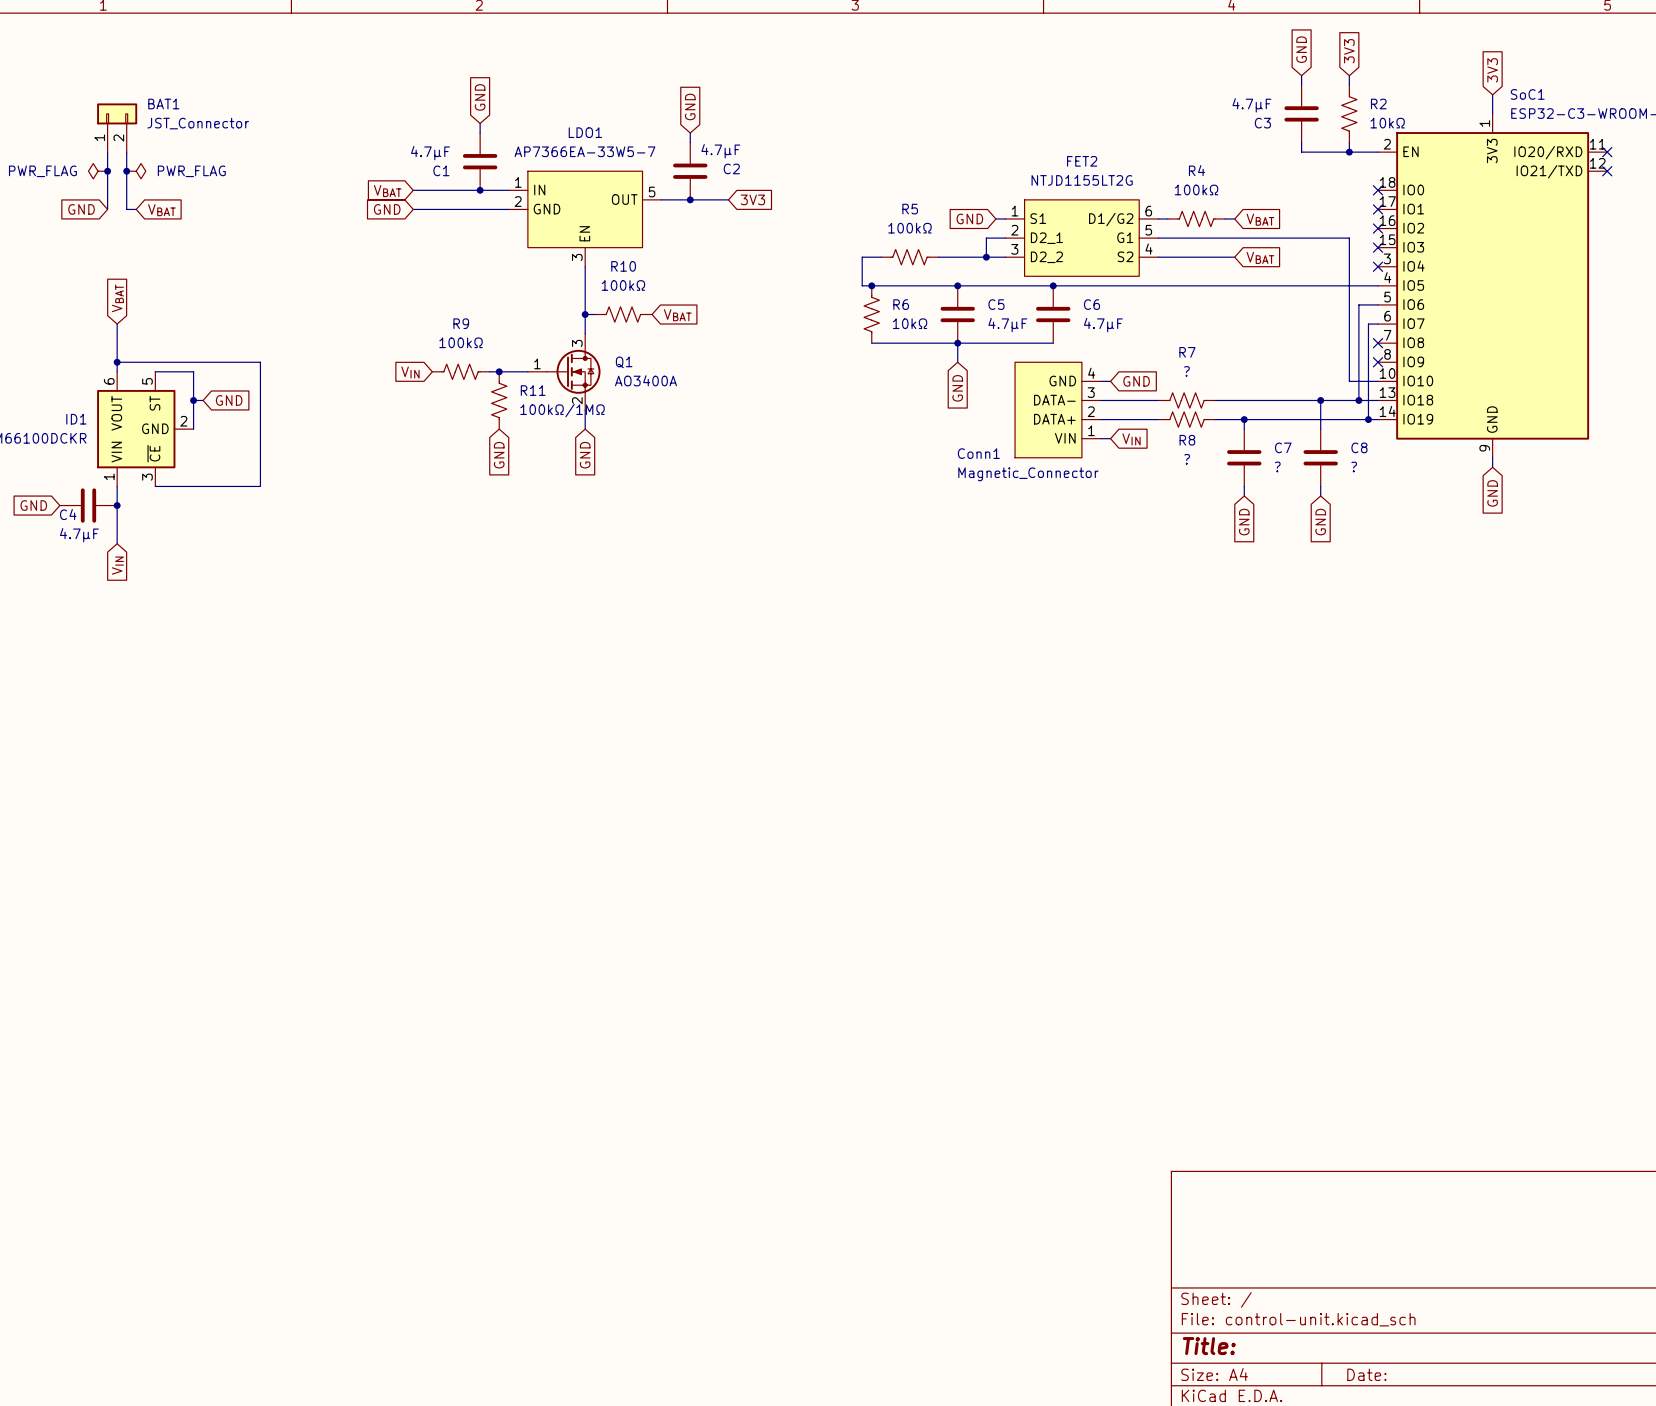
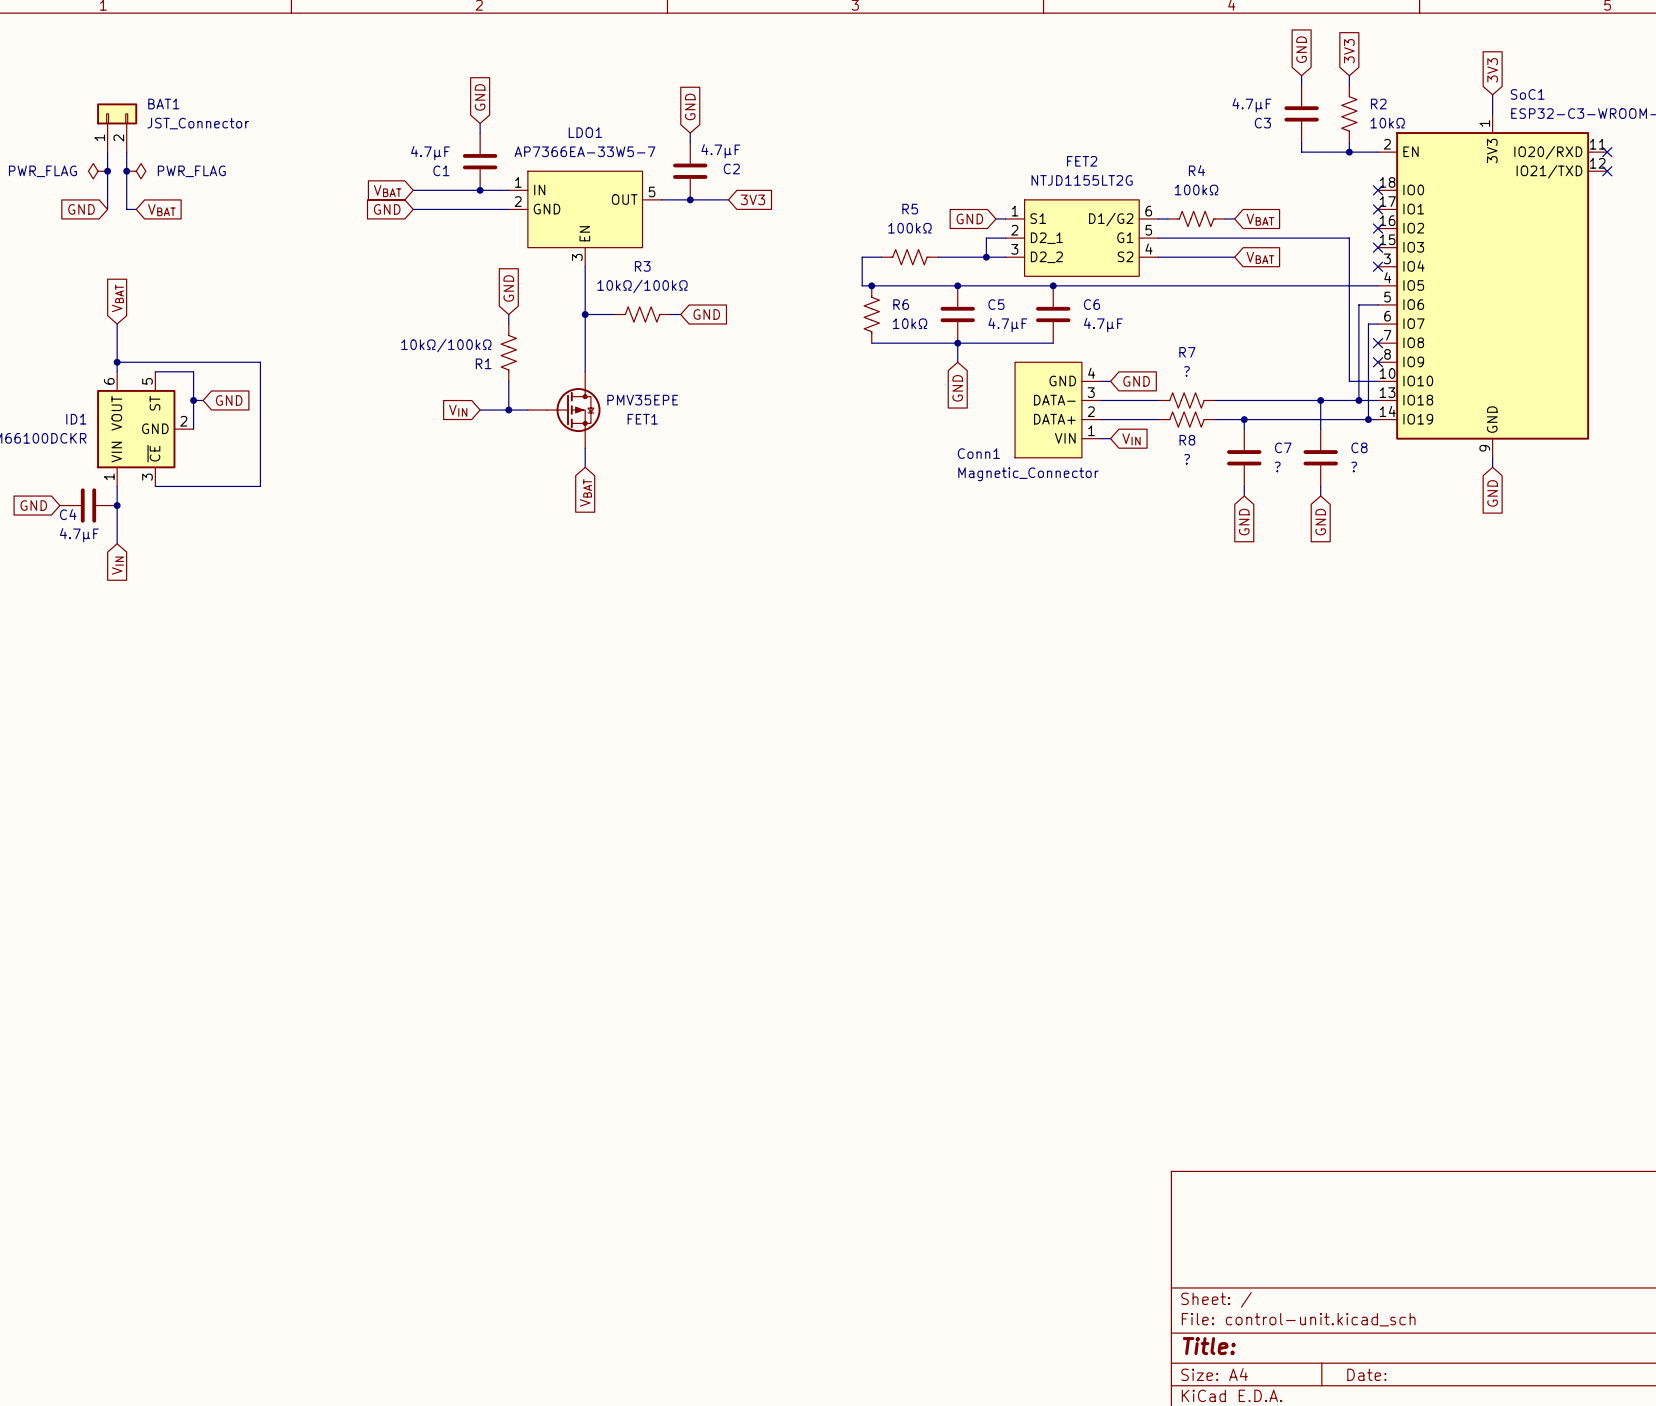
global label: none -> GND (508, 288)
wire: none -> (508, 314) (508, 324)
R10: 100kΩ (623, 314) -> none
R3: none -> 10kΩ/100kΩ (642, 314)
wire: none -> (671, 314) (680, 314)
global label: none -> GND (706, 314)
global label rotation: 0° (677, 315) -> 90° clockwise (585, 492)
global label position: VBAT (677, 315) -> VBAT (585, 492)
R1: none -> 10kΩ/100kΩ (508, 352)
R9: 100kΩ (461, 371) -> none
wire: (489, 371) (527, 371) -> none
junction position: (499, 371) -> (508, 410)
Q1: AO3400A (564, 371) -> none
global label position: VIN (410, 372) -> VIN (458, 410)
wire: none -> (508, 381) (508, 410)
R11: 100kΩ/1MΩ (499, 400) -> none
wire: none -> (480, 410) (527, 410)
FET1: none -> PMV35EPE (564, 410)
global label: GND (499, 455) -> none
global label: GND (585, 455) -> none

